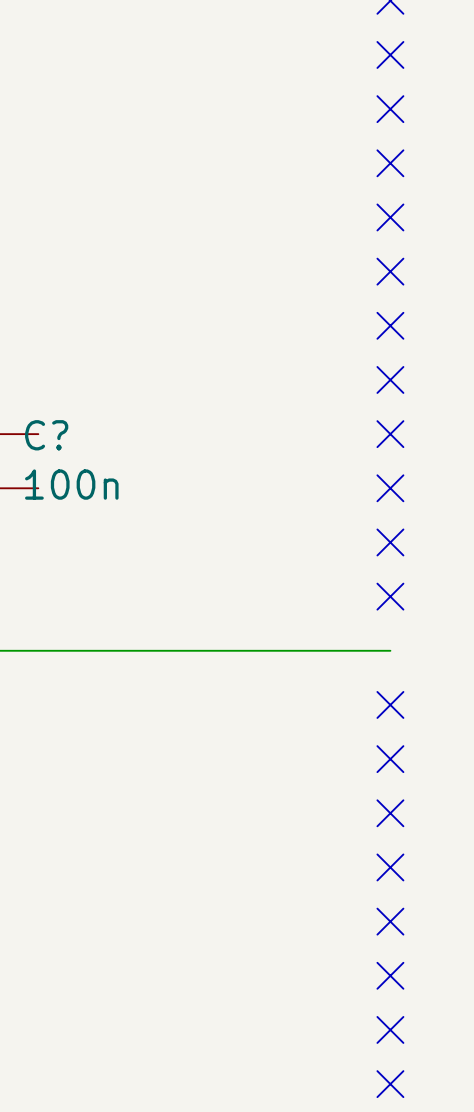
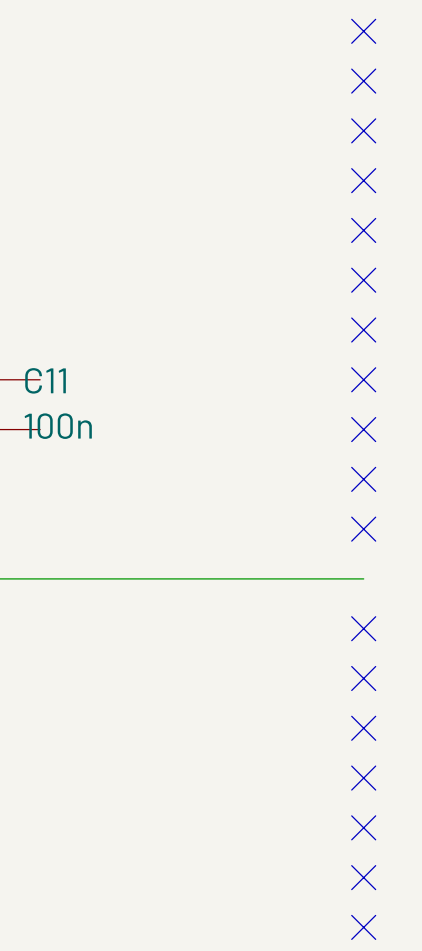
C? name: C? (46, 435) -> C11 (45, 380)

